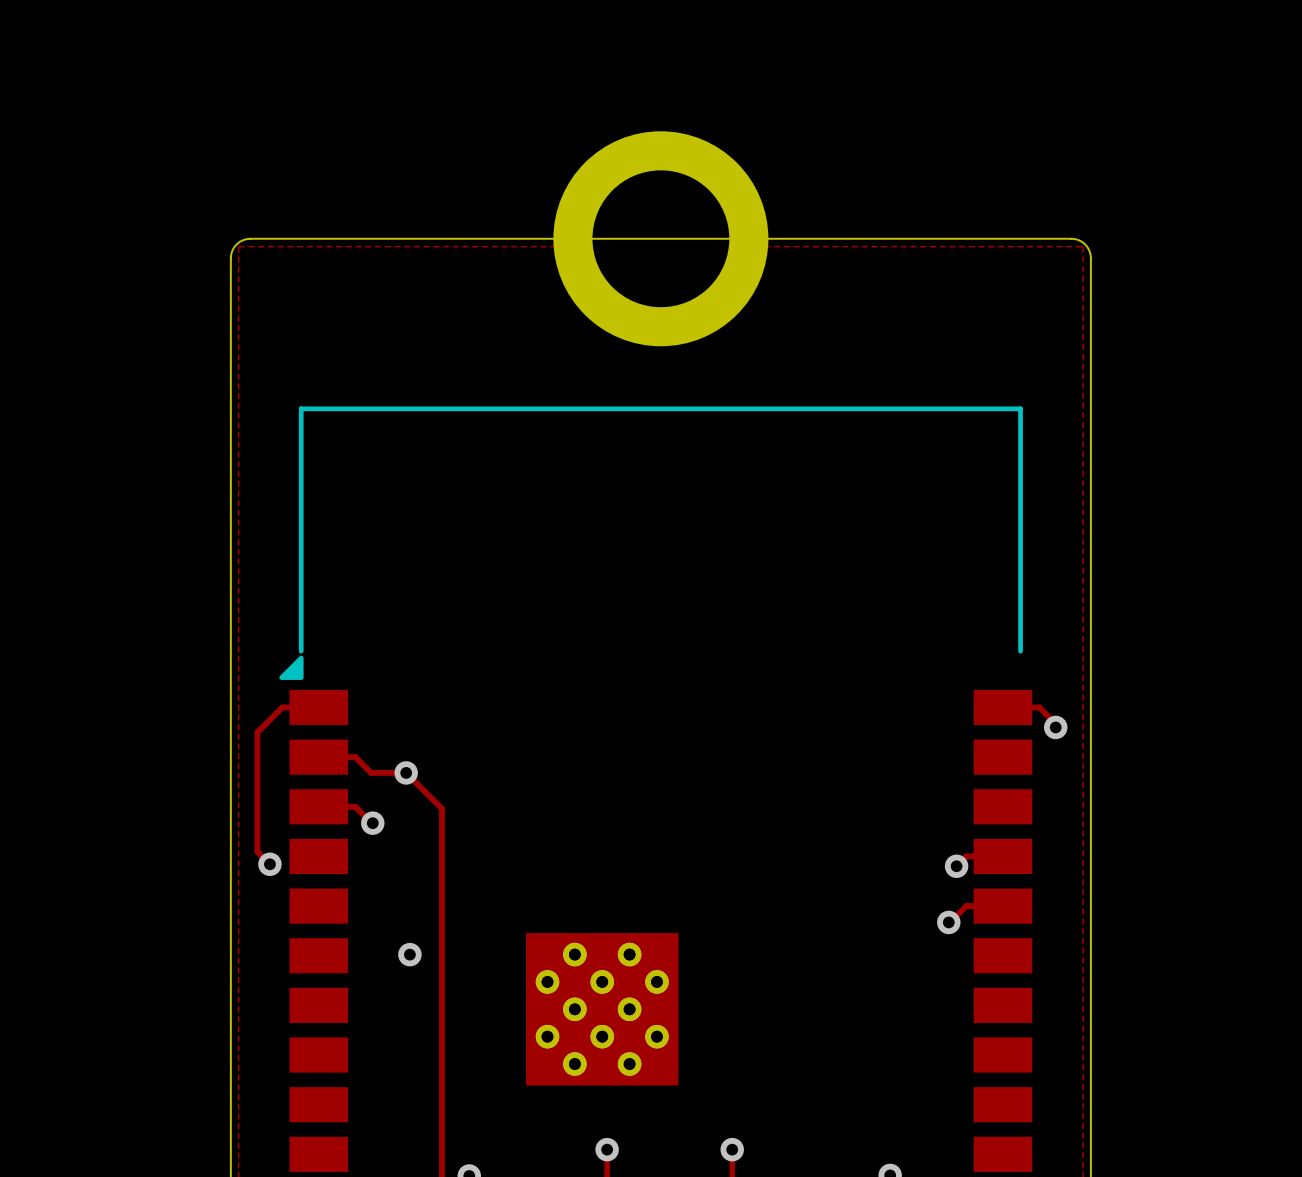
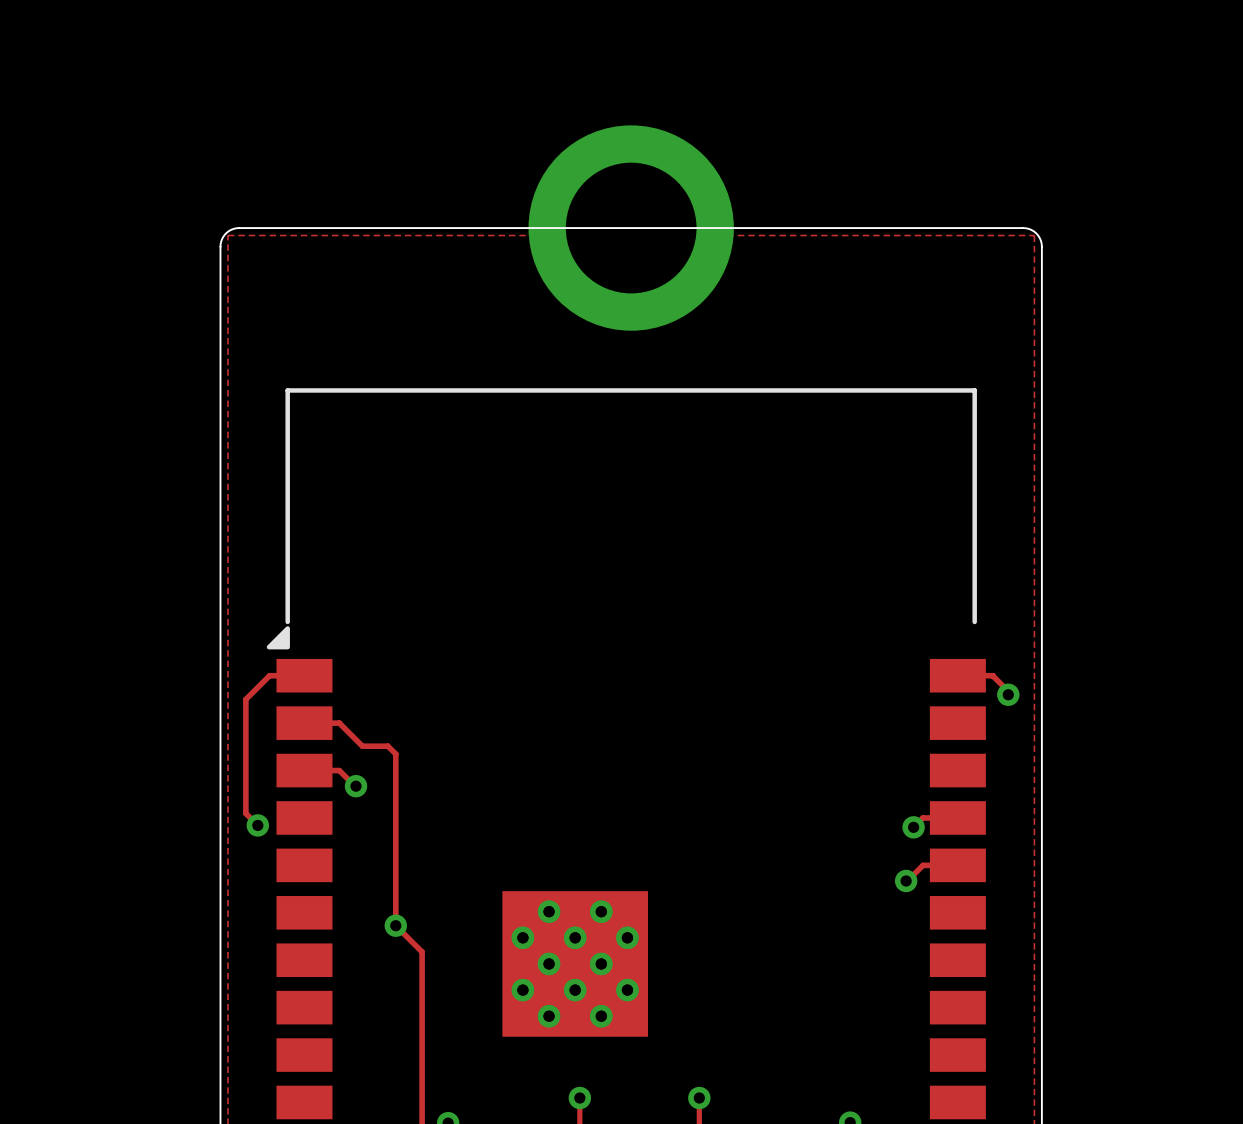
track: (371, 772) (406, 772) (441, 808) (441, 996) -> (354, 738) (362, 746) (387, 746) (395, 754) (395, 925) (422, 952)
via: (406, 772) -> none
via position: (409, 954) -> (395, 925)

